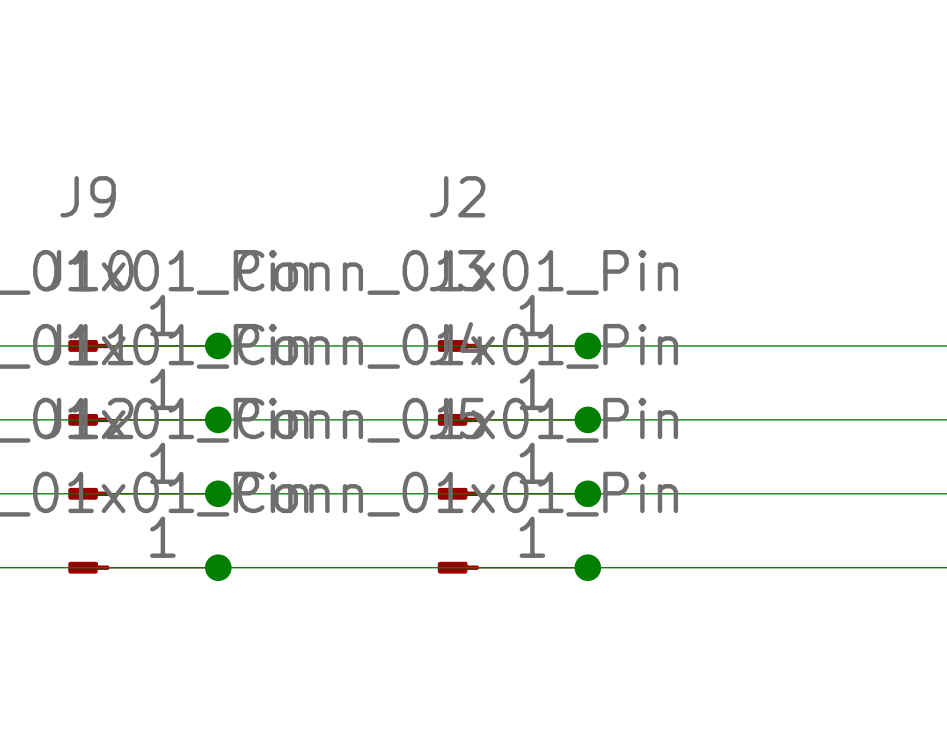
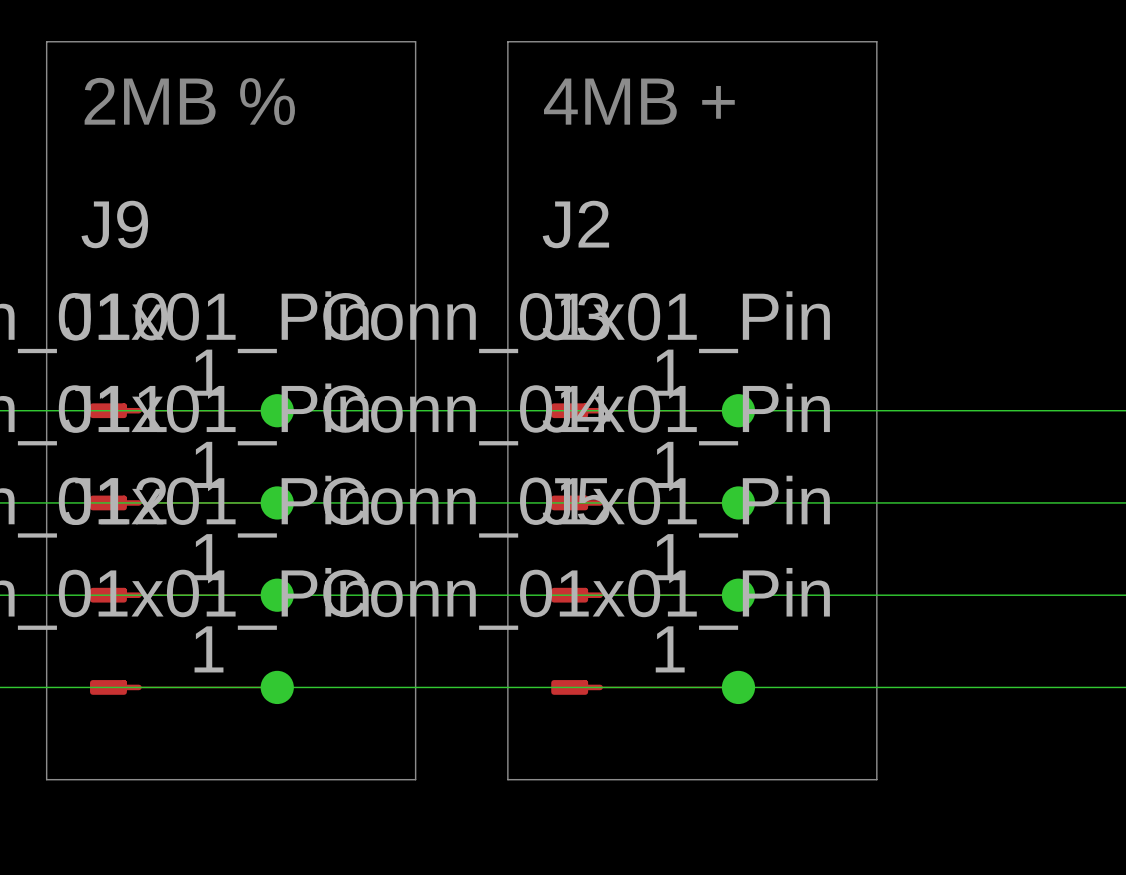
line: none -> (46, 41) (415, 41) (415, 779) (46, 779) (46, 41)
line: none -> (507, 41) (876, 41) (876, 779) (507, 779) (507, 41)
text: none -> 4MB + (639, 101)
text: none -> 2MB % (189, 101)

